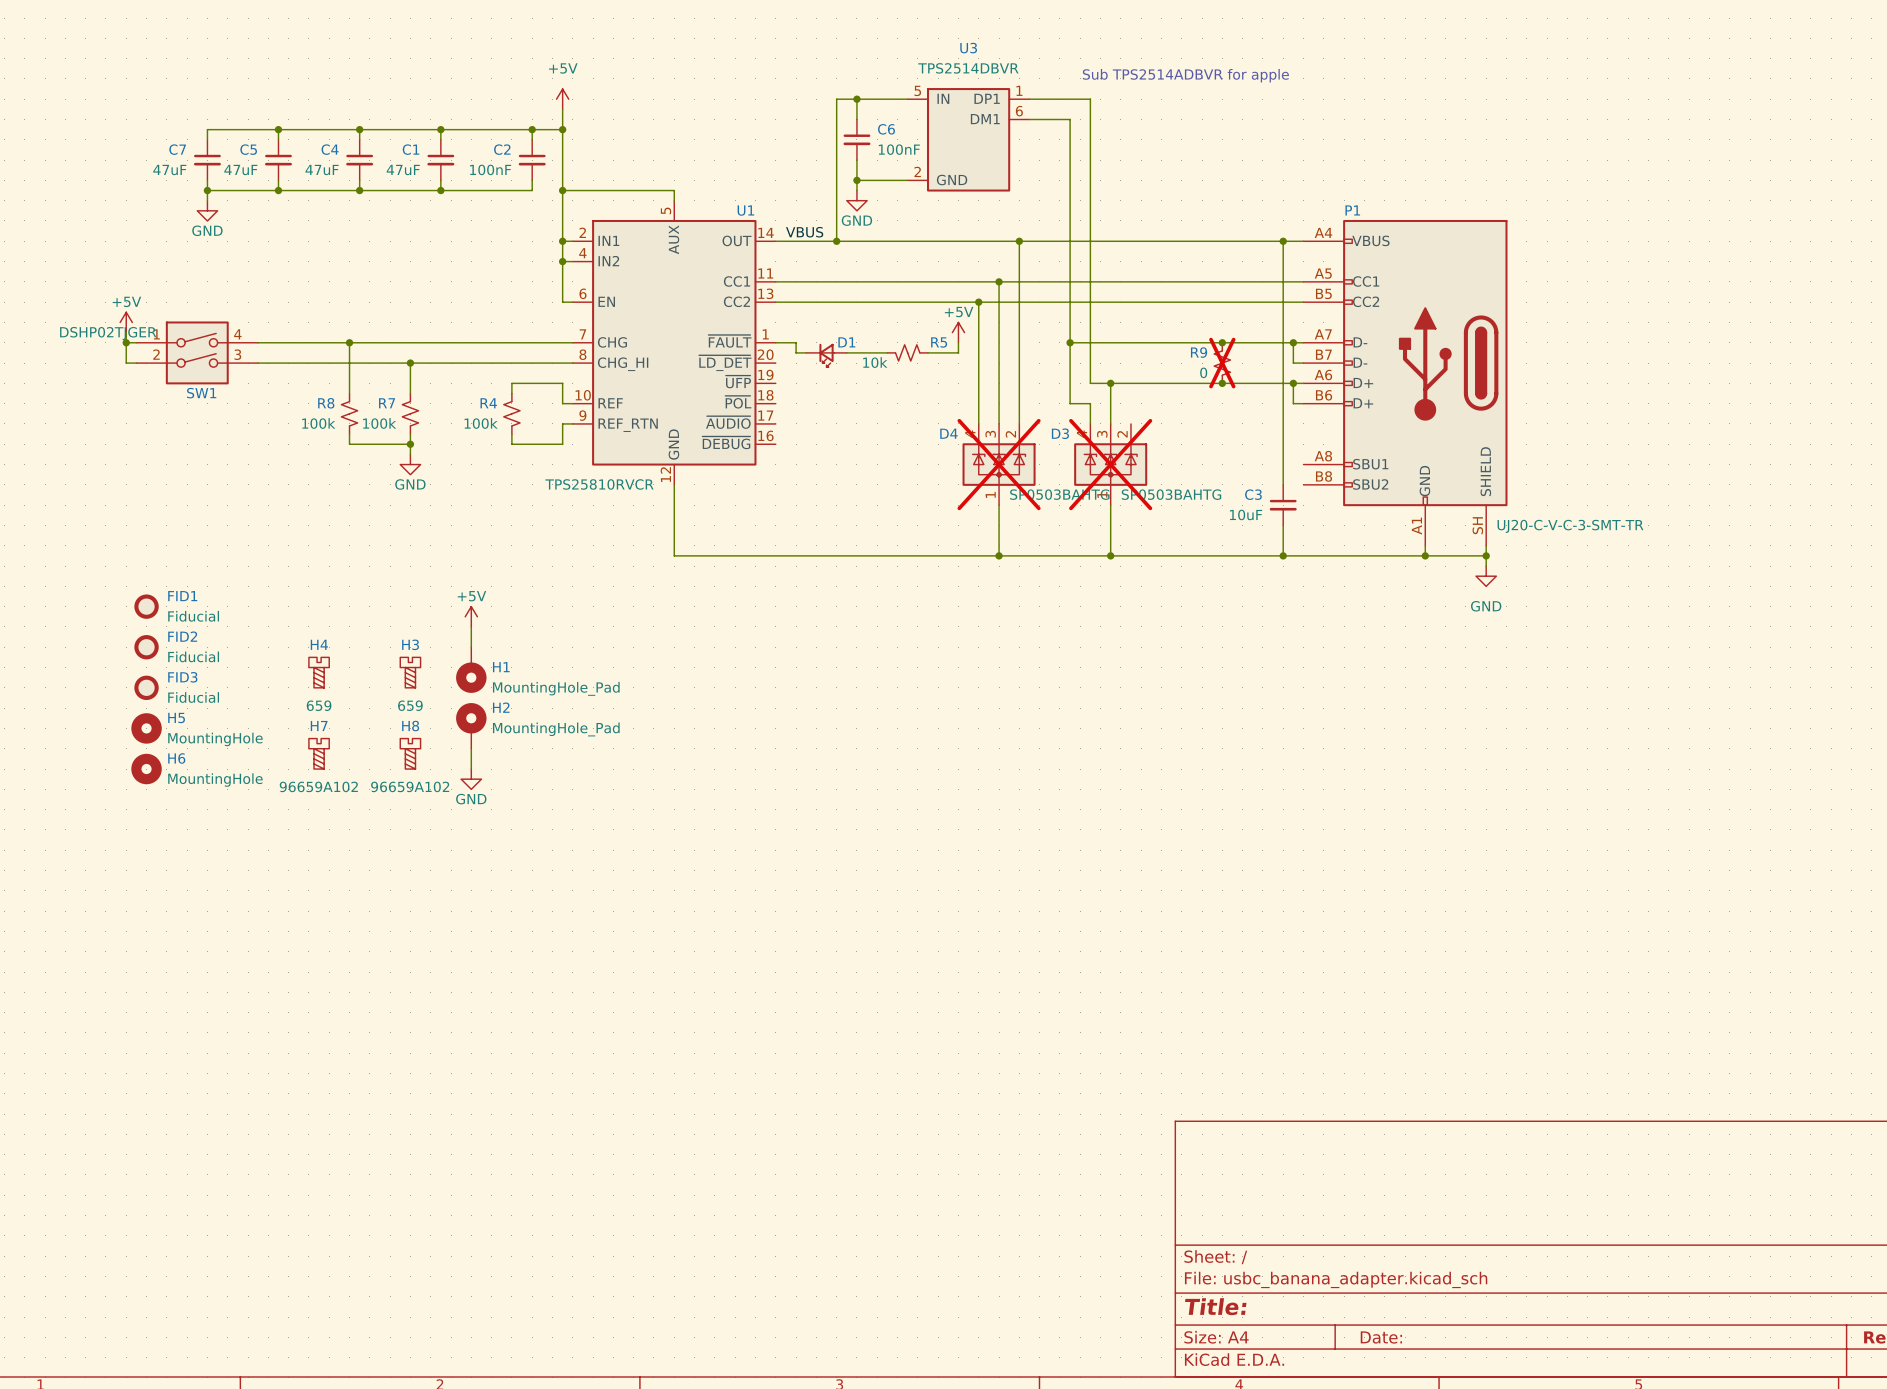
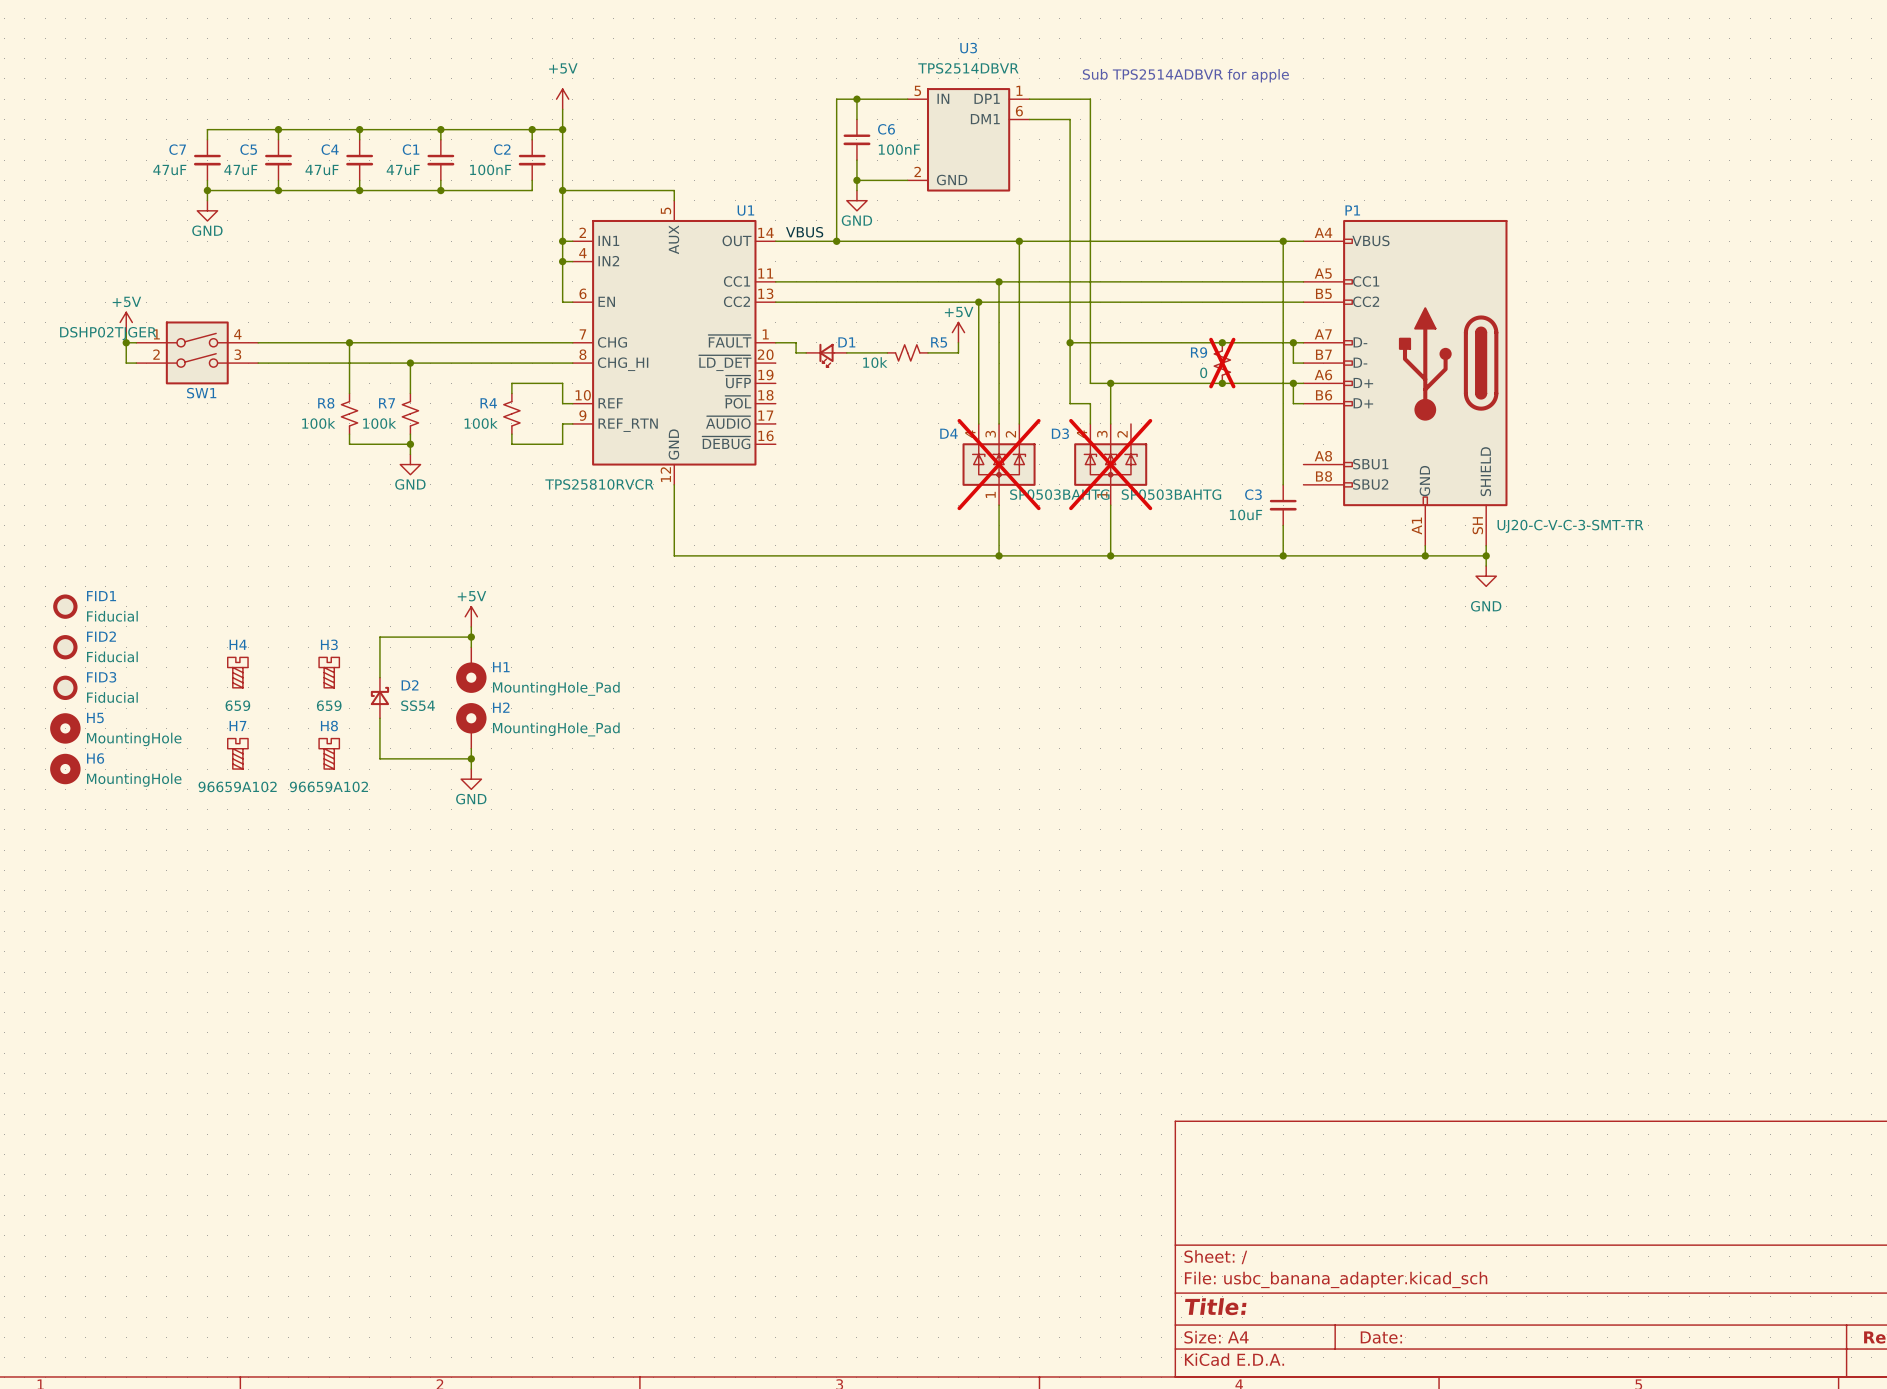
FID1 position: (146, 606) -> (65, 606)
wire: none -> (471, 637) (379, 637) (379, 677)
junction: none -> (471, 637)
FID2 position: (146, 647) -> (65, 647)
H4 position: (319, 672) -> (237, 672)
H3 position: (410, 672) -> (329, 672)
FID3 position: (146, 687) -> (65, 687)
D2: none -> SS54 (379, 697)
wire: none -> (379, 718) (379, 758) (471, 758)
H5 position: (146, 728) -> (65, 728)
H7 position: (319, 753) -> (237, 753)
H8 position: (410, 753) -> (329, 753)
junction: none -> (471, 758)
H6 position: (146, 769) -> (65, 769)

